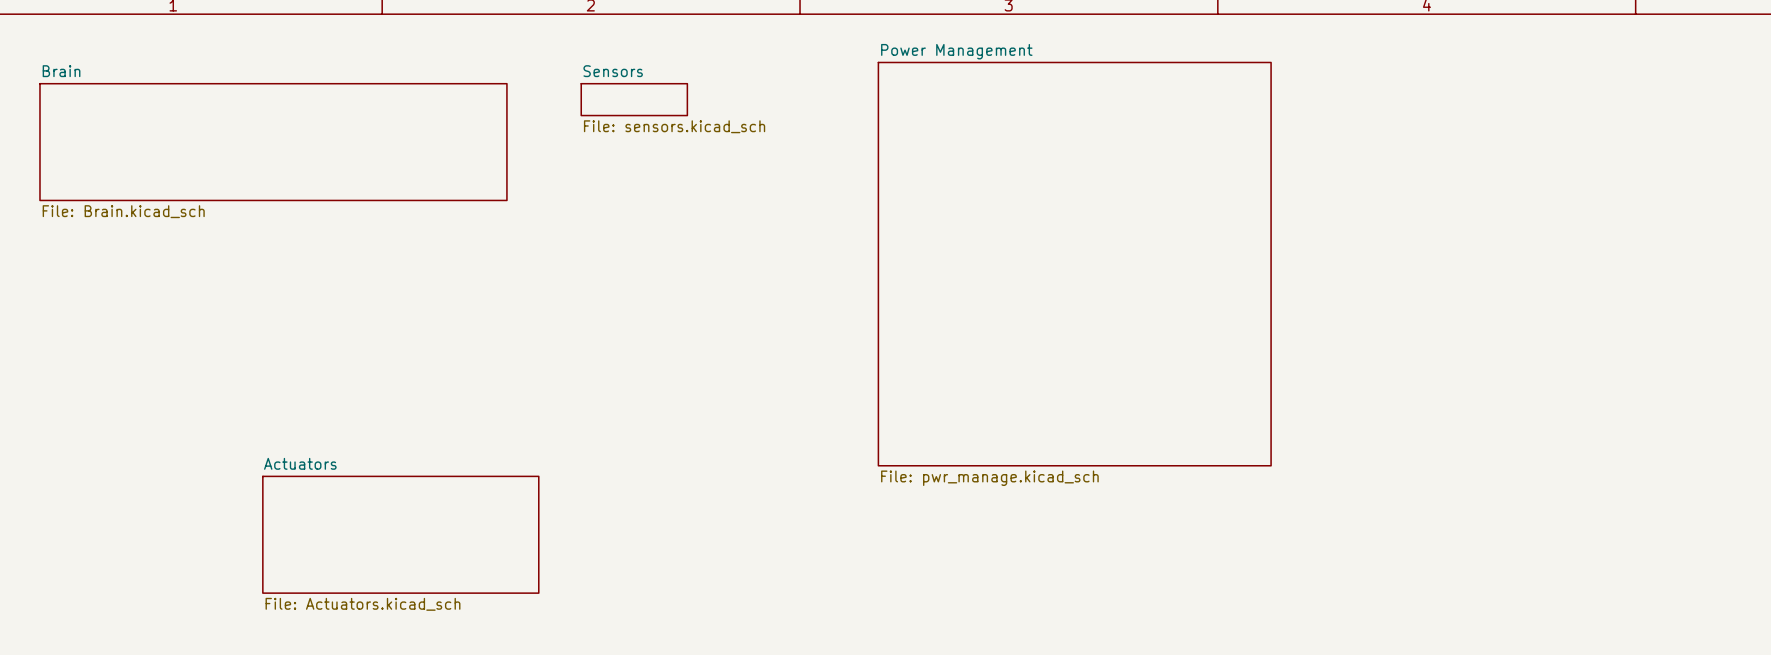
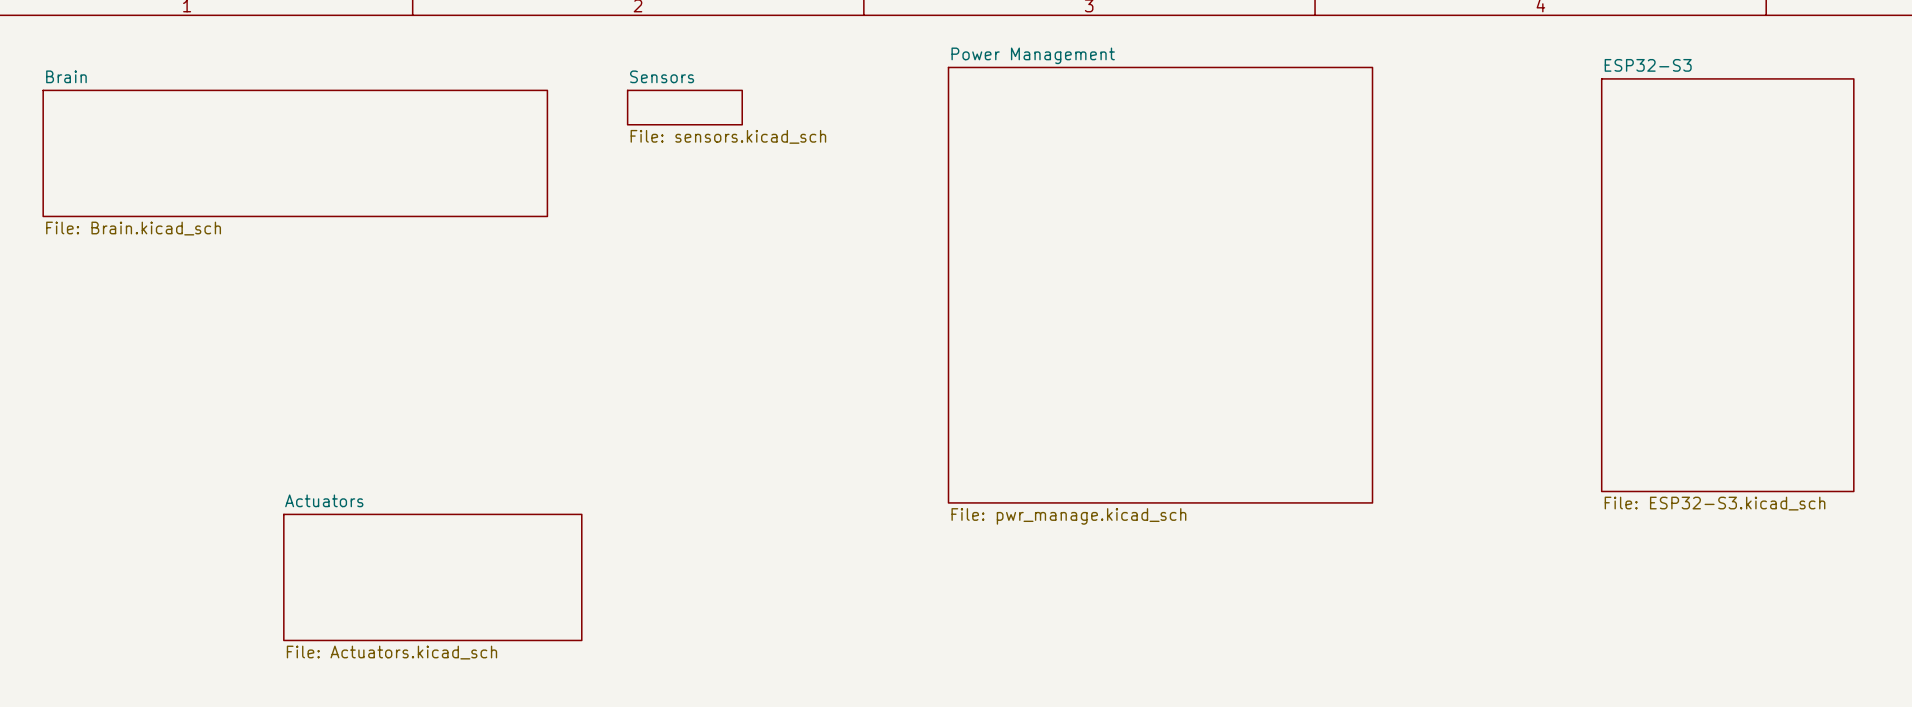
sheet ESP32-S3: none -> File: ESP32-S3.kicad_sch (1727, 285)

